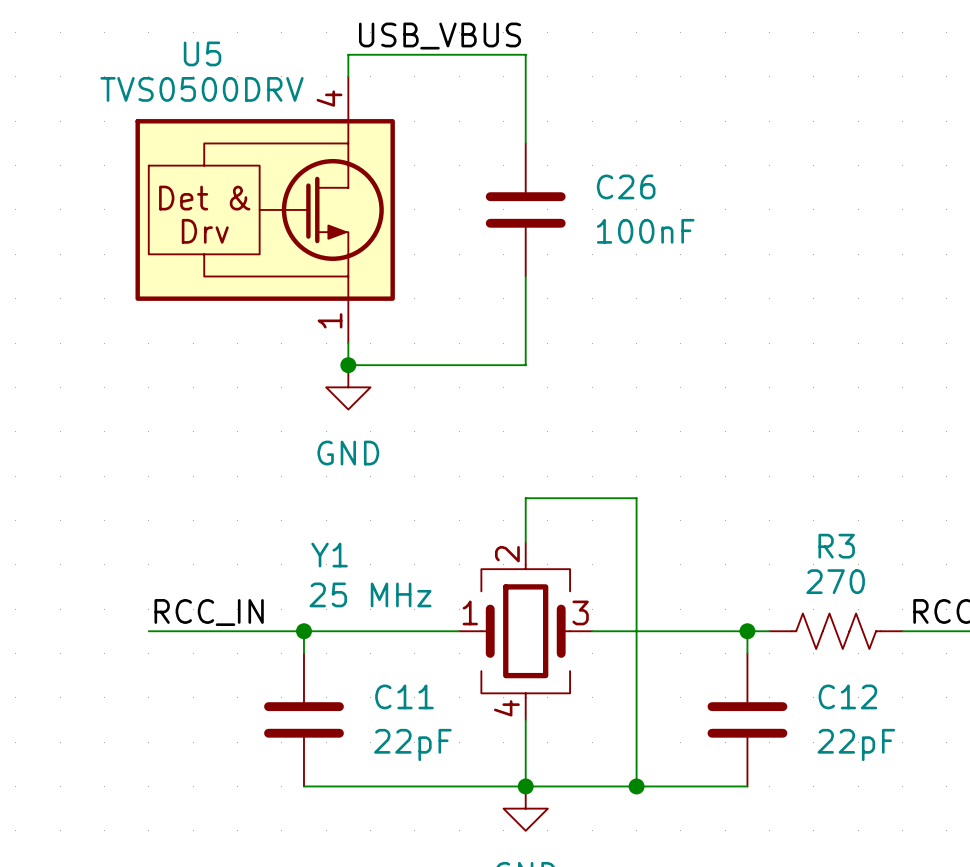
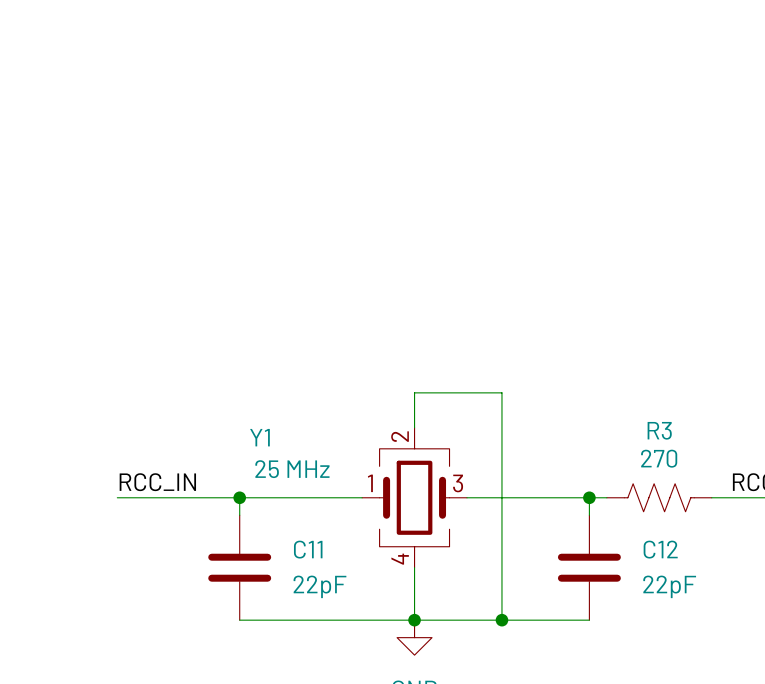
label: USB_VBUS (440, 36) -> none
wire: (348, 76) (348, 54) (525, 54) (525, 143) -> none
U5: TVS0500DRV (265, 209) -> none
C26: 100nF (525, 209) -> none
wire: (525, 276) (525, 365) (348, 365) (348, 343) -> none
junction: (348, 365) -> none
power symbol: GND (348, 387) -> none

